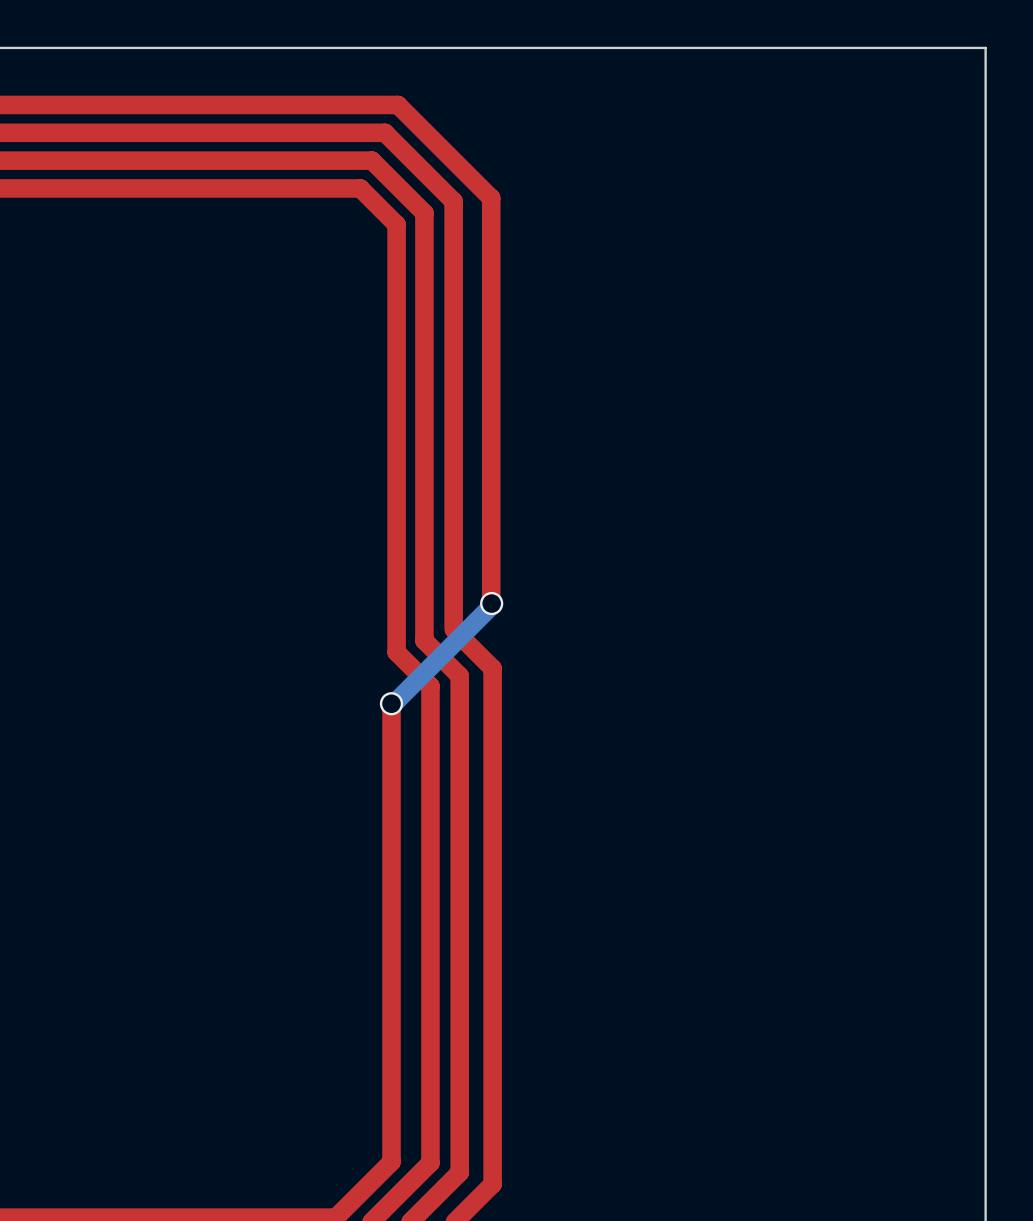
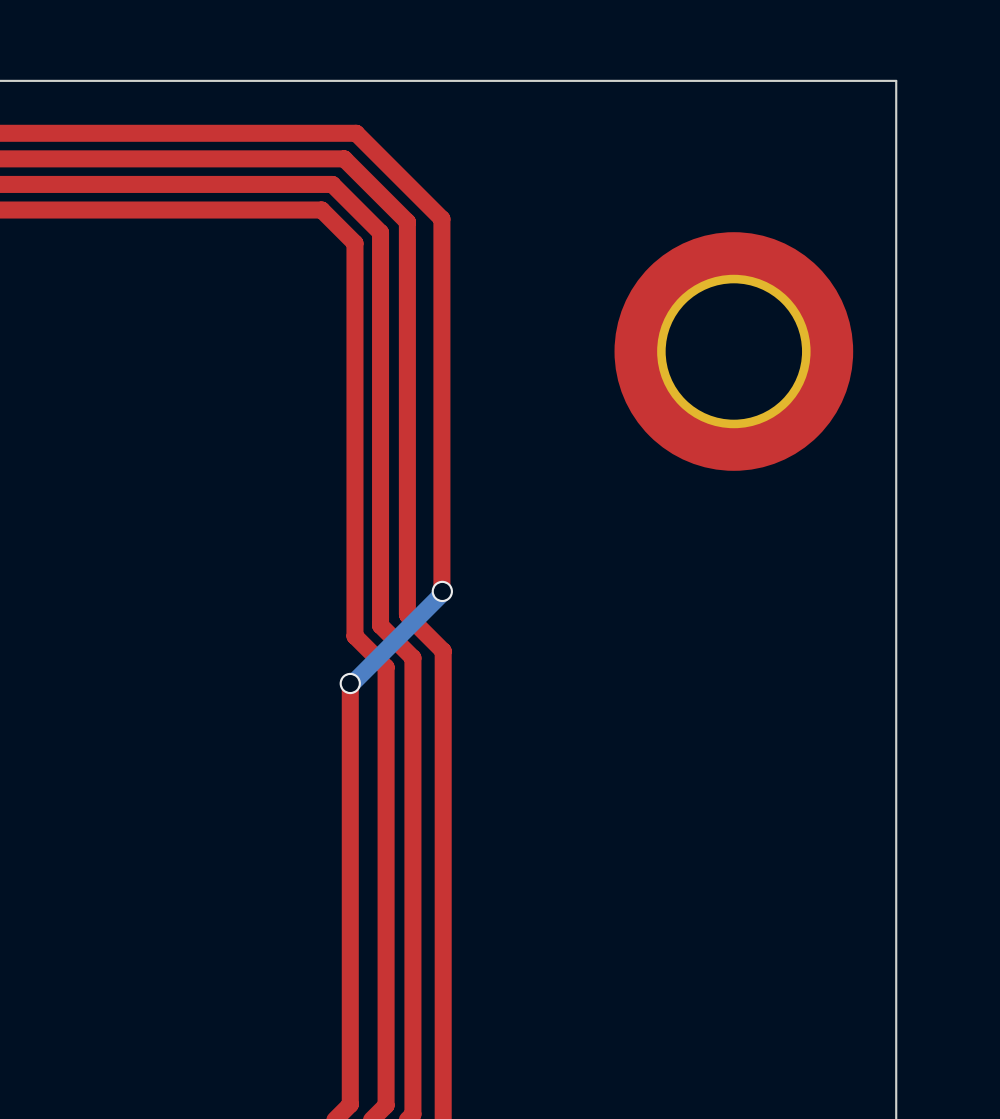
part: none -> (733, 351)

